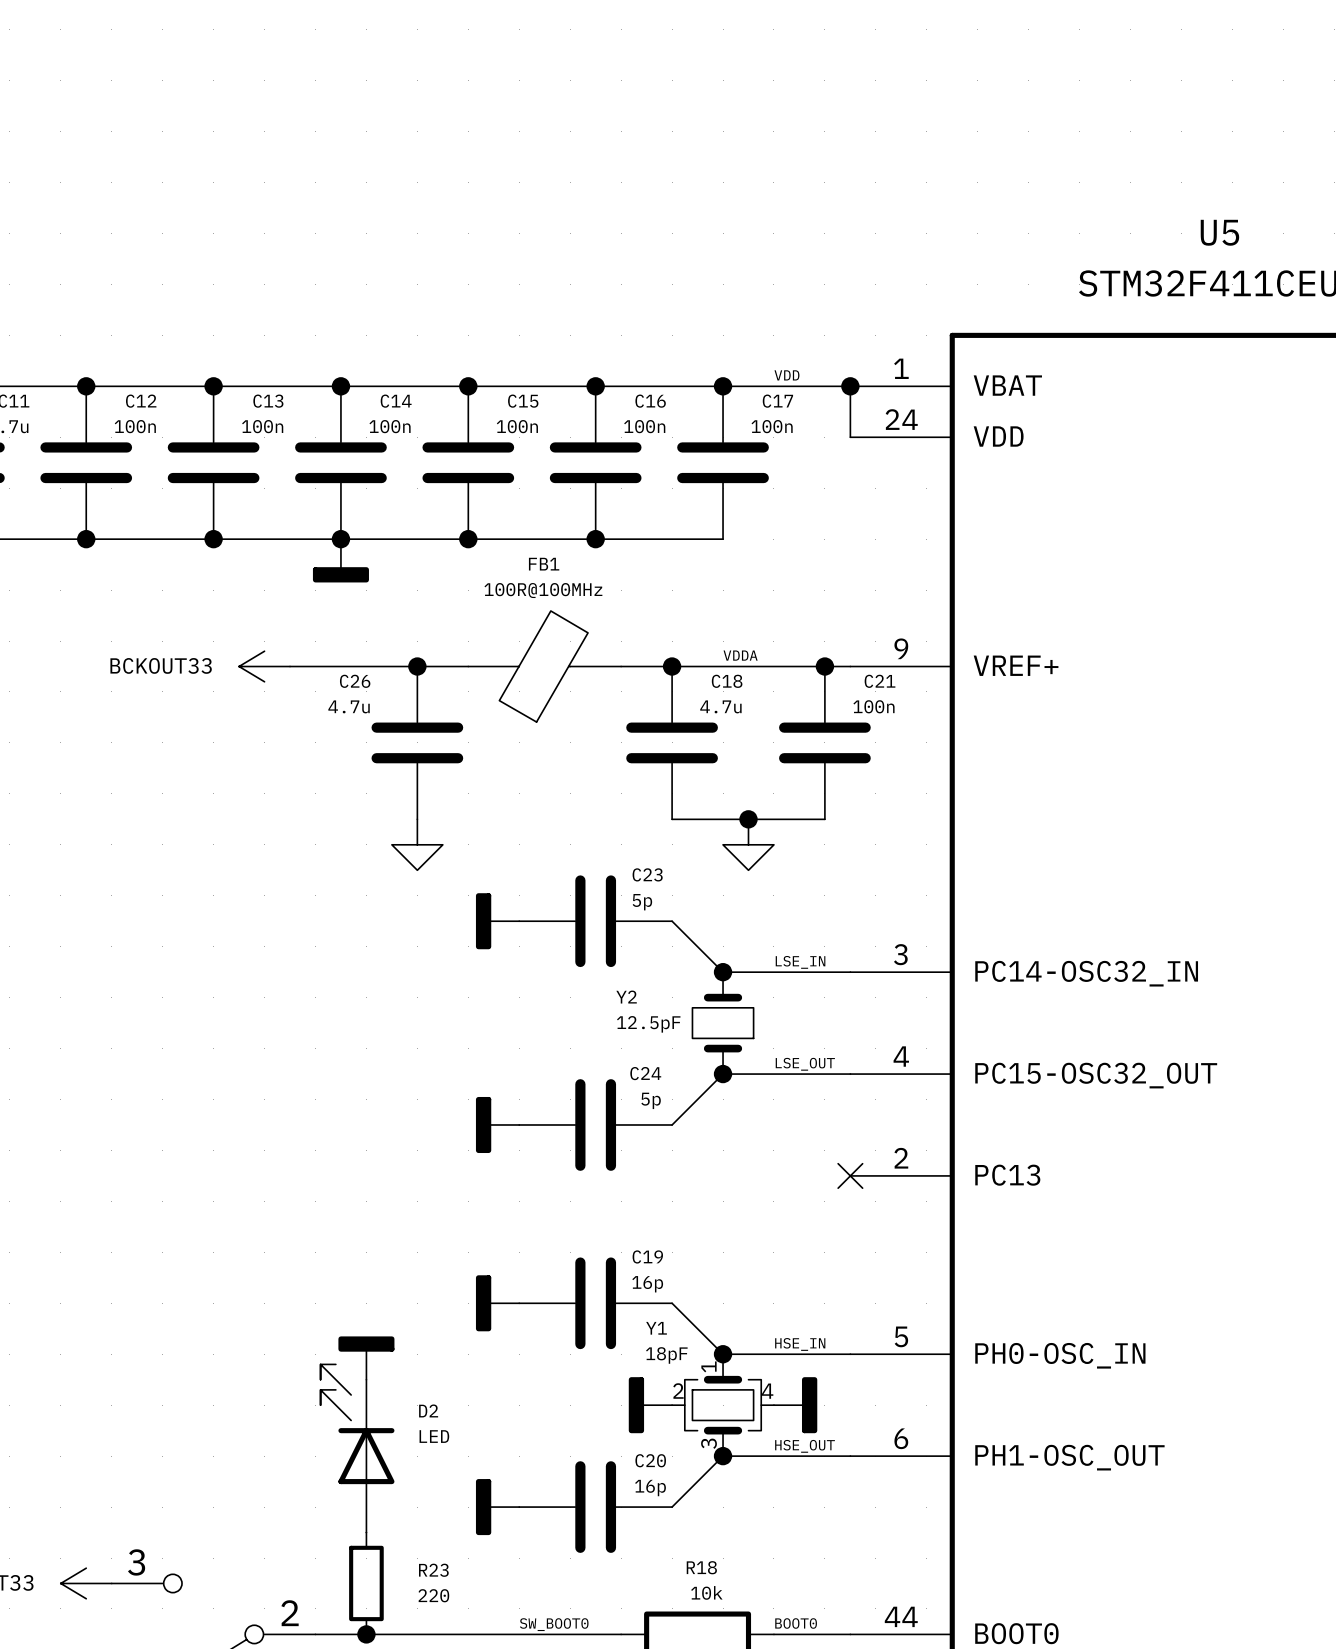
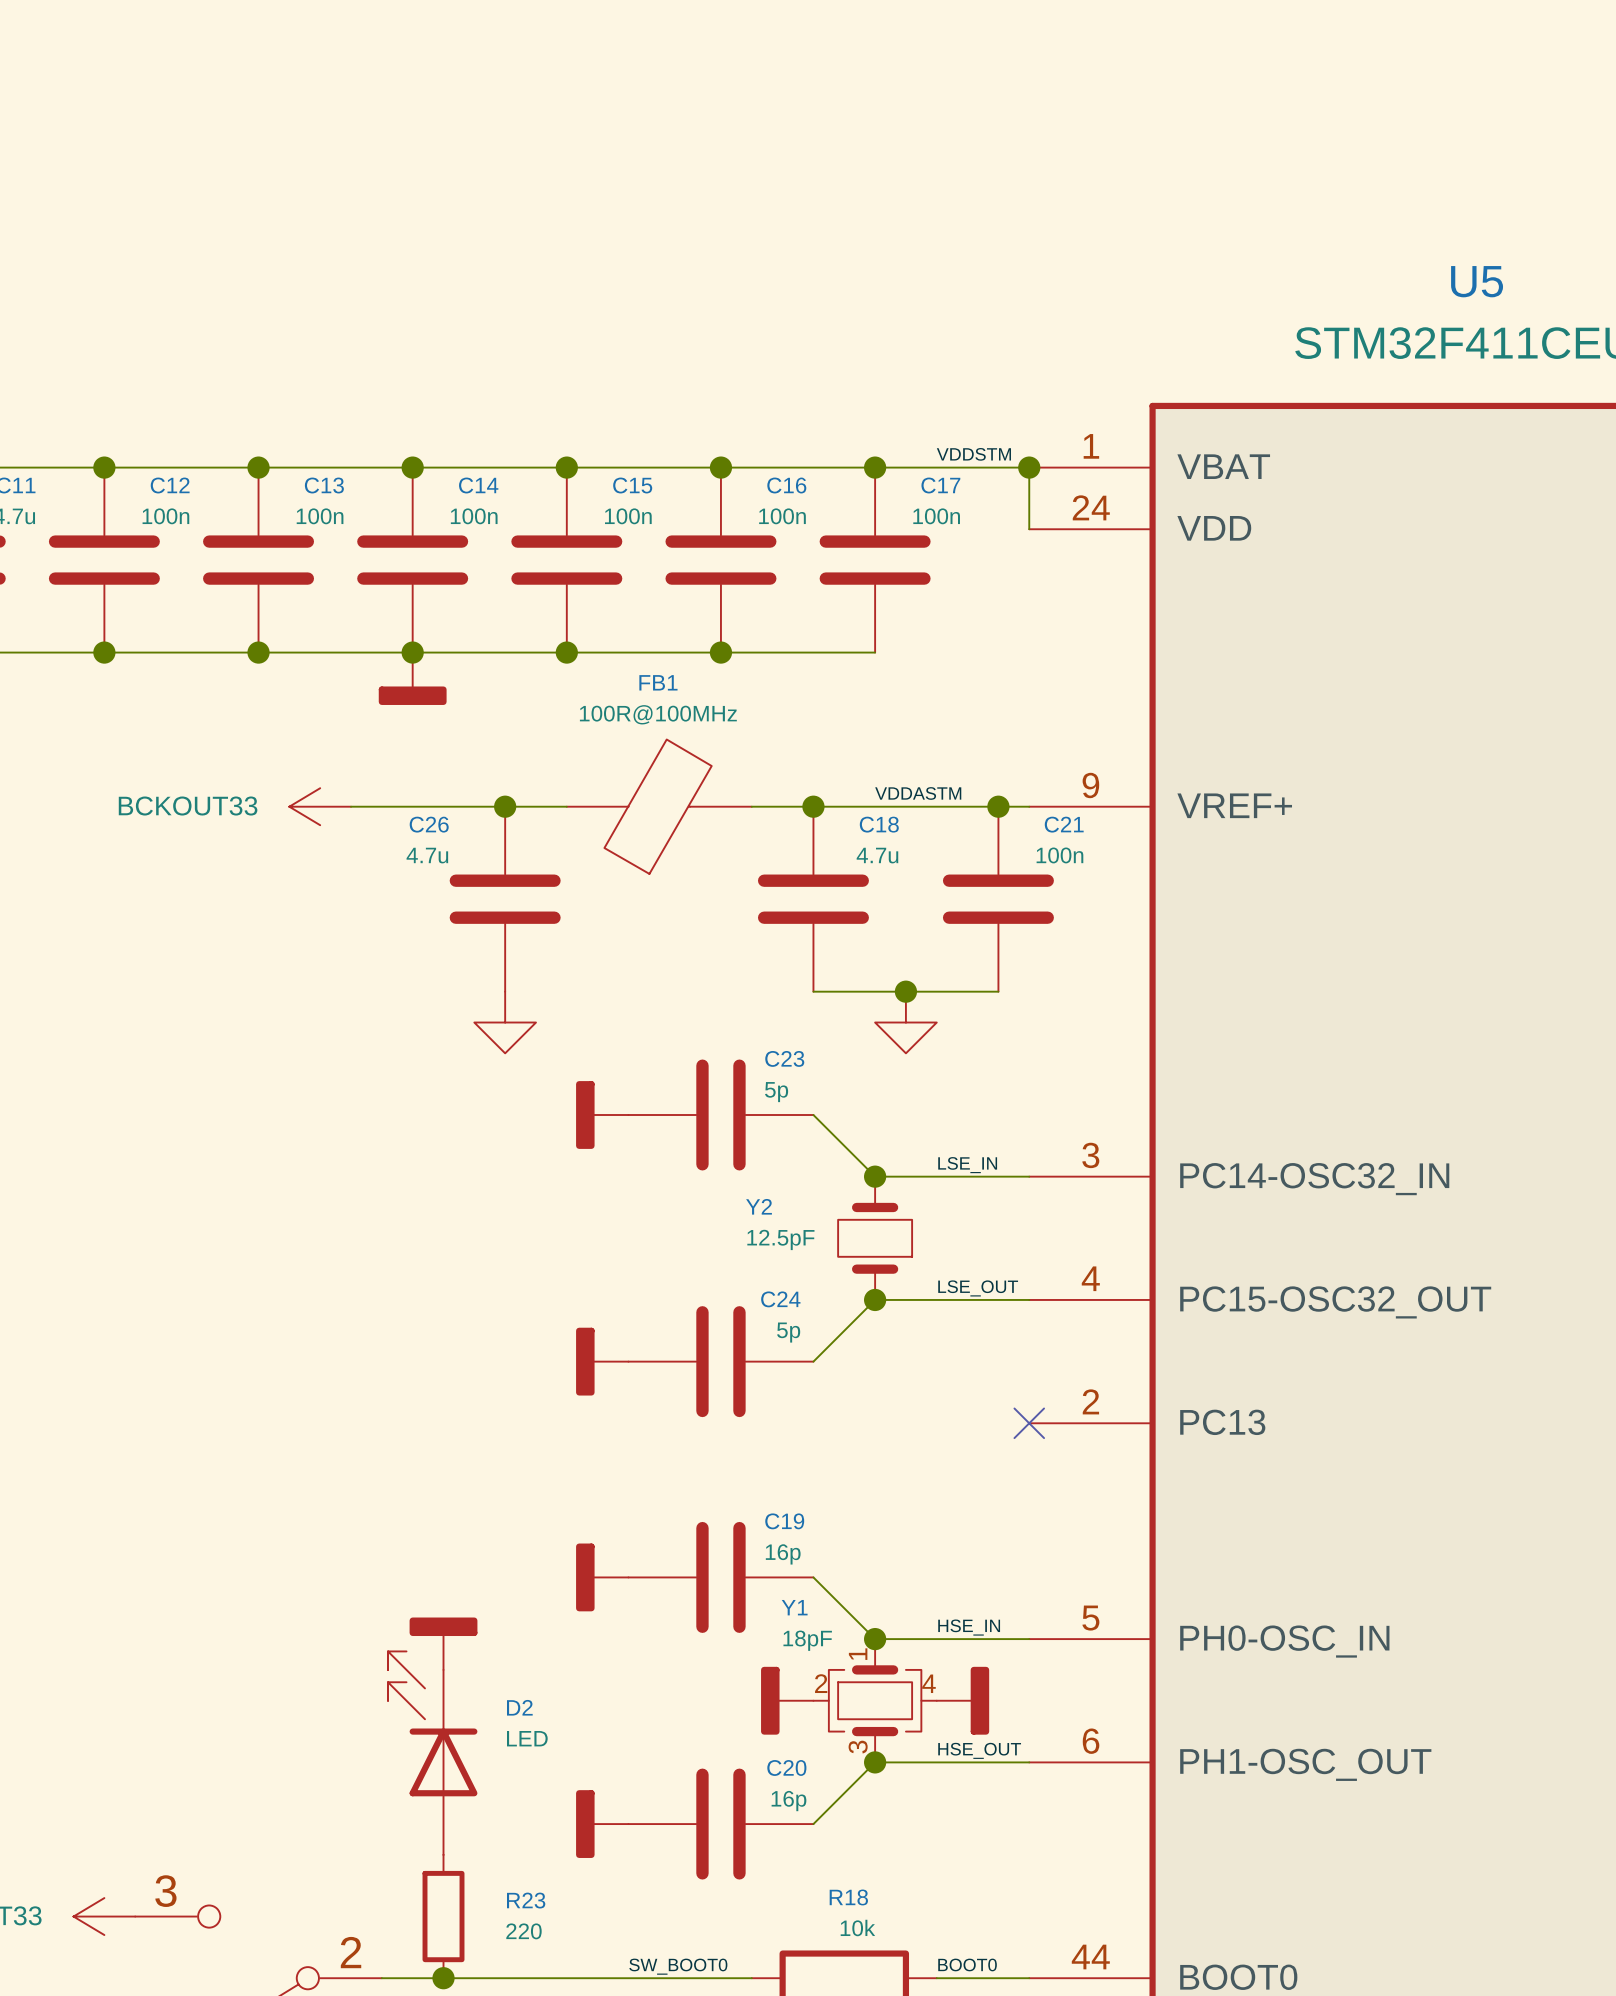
label: VDD (786, 375) -> VDDSTM (973, 454)
label: VDDA (740, 655) -> VDDASTM (918, 793)

